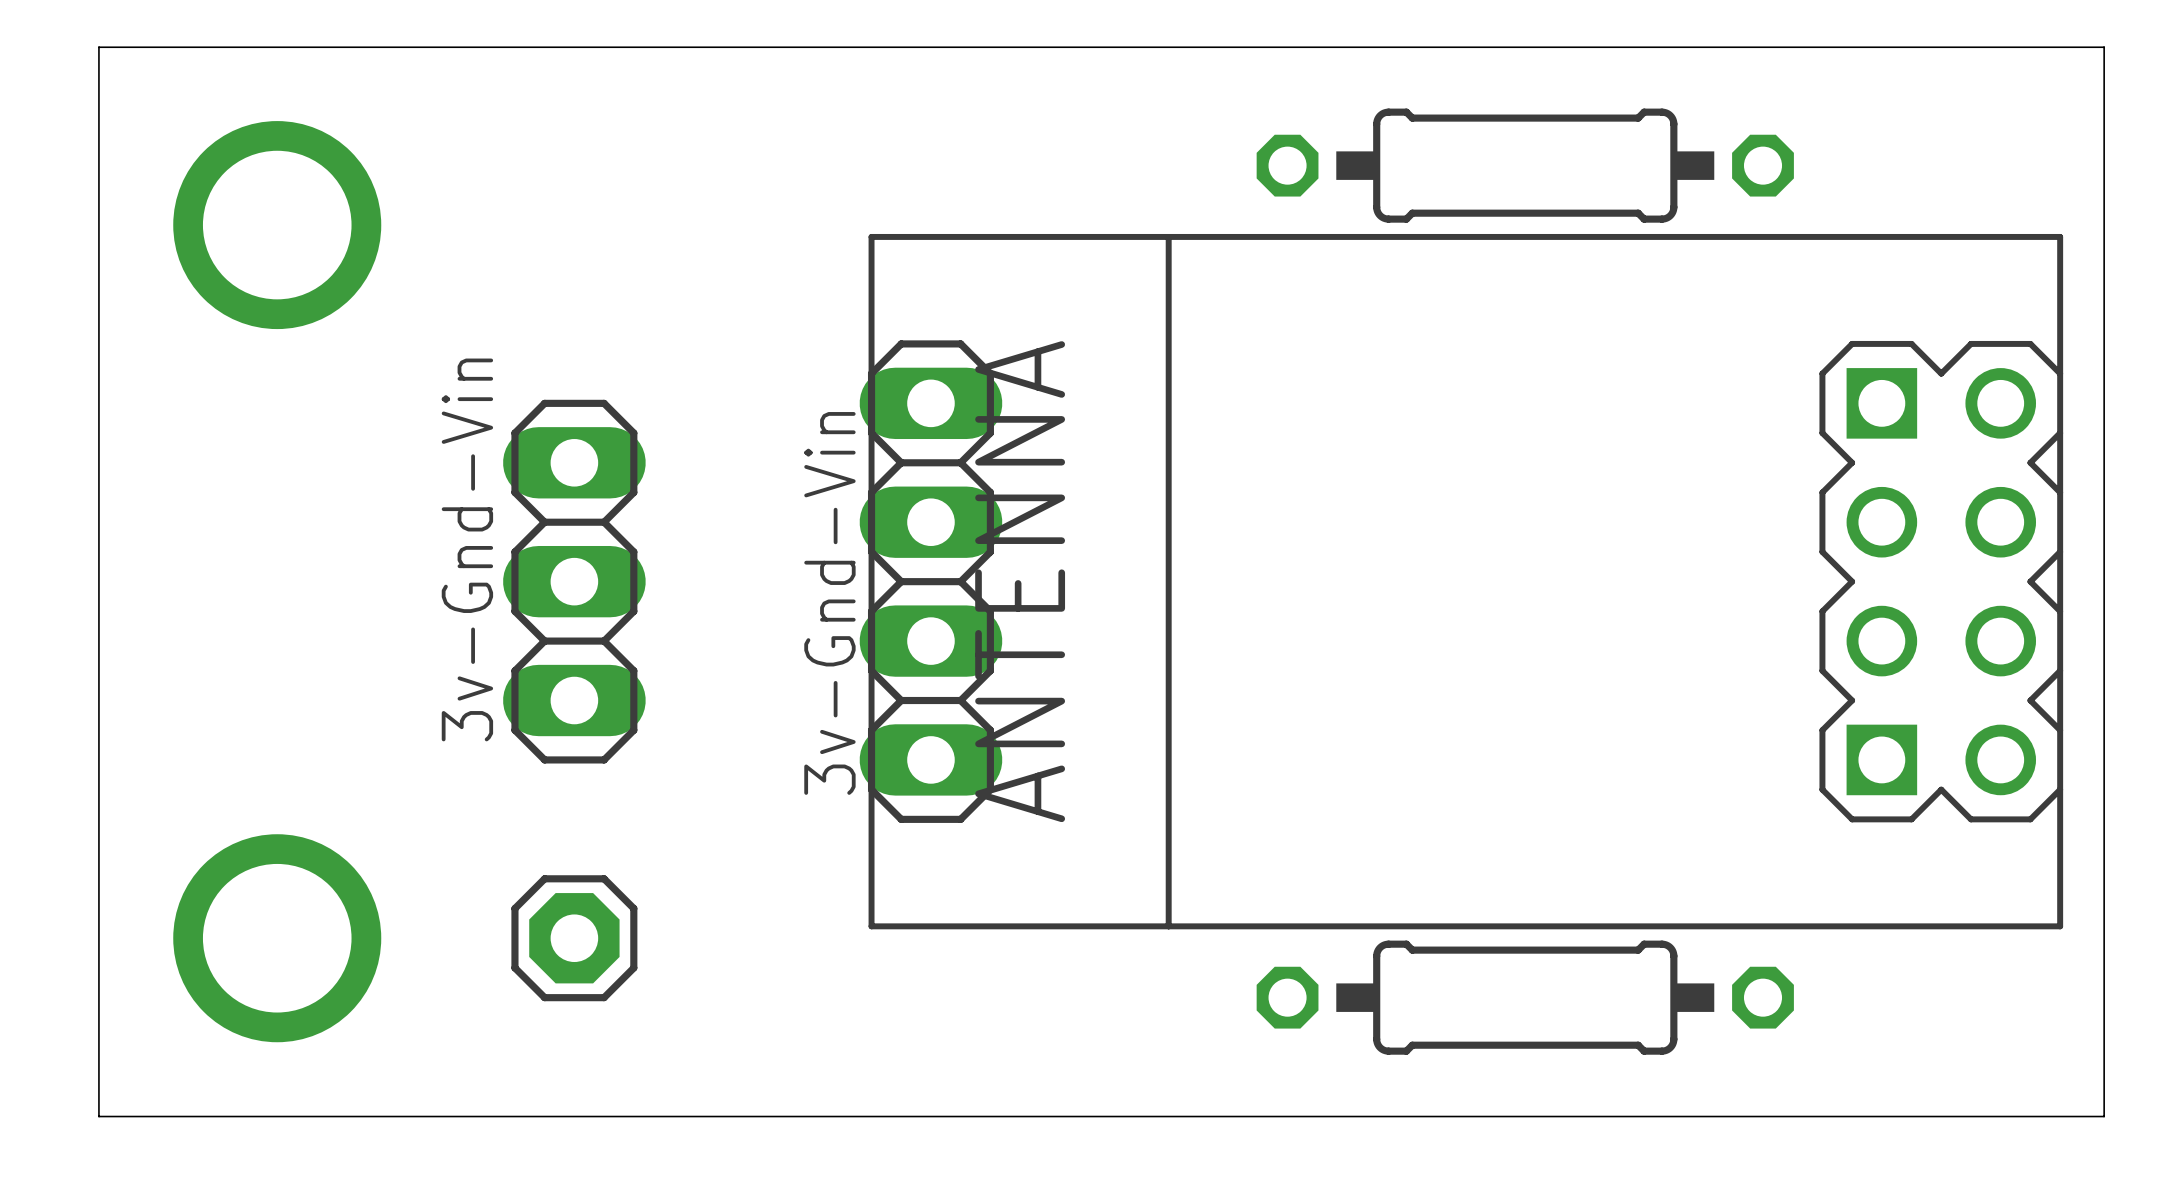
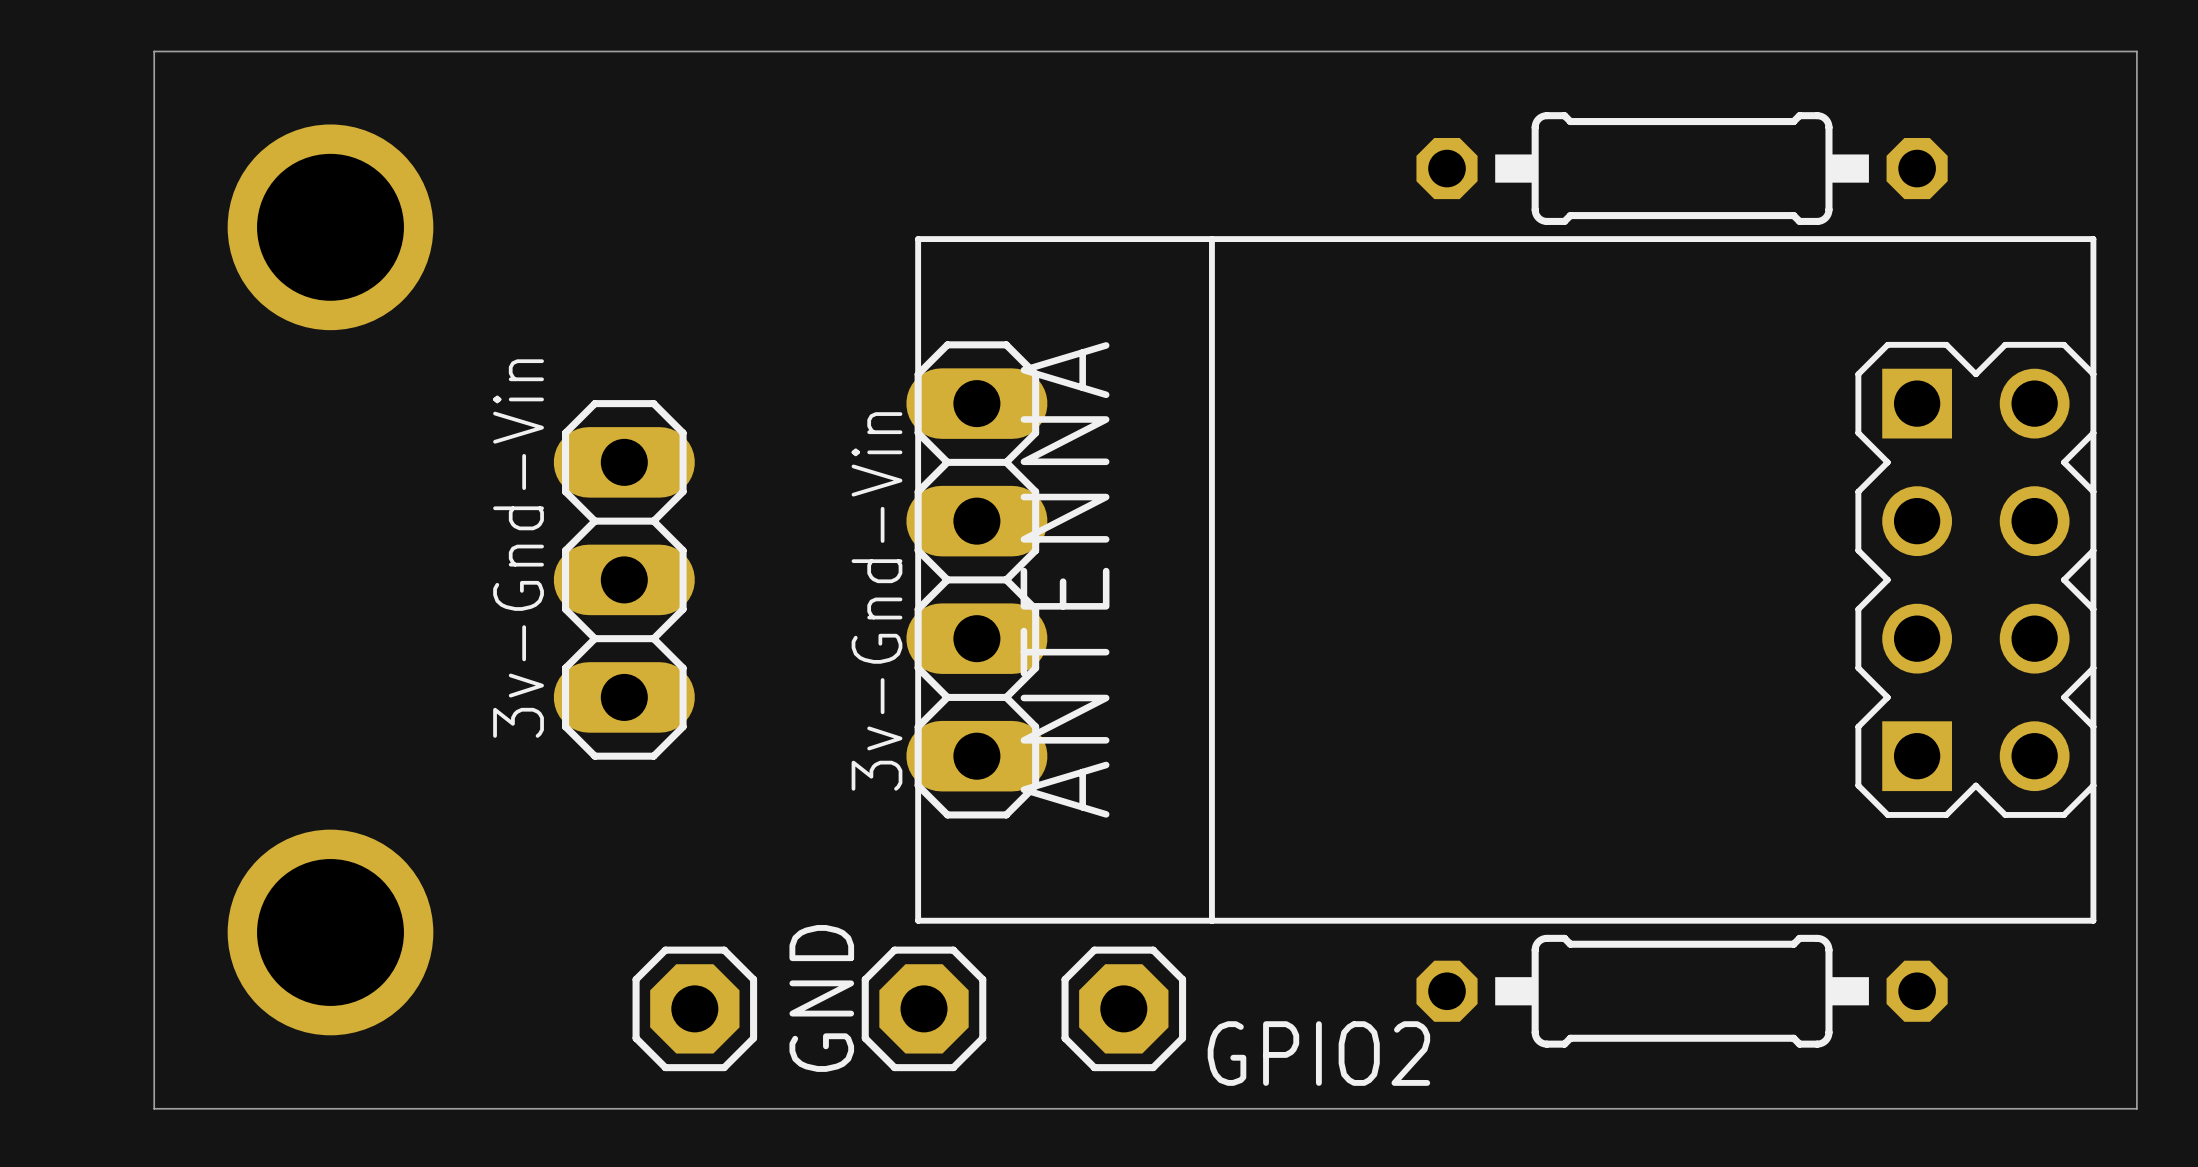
part position: (1525, 165) -> (1682, 168)
part position: (574, 938) -> (694, 1008)
part position: (1525, 997) -> (1682, 991)
GND: none -> (924, 1008)
GPIO2: none -> (1123, 1008)

